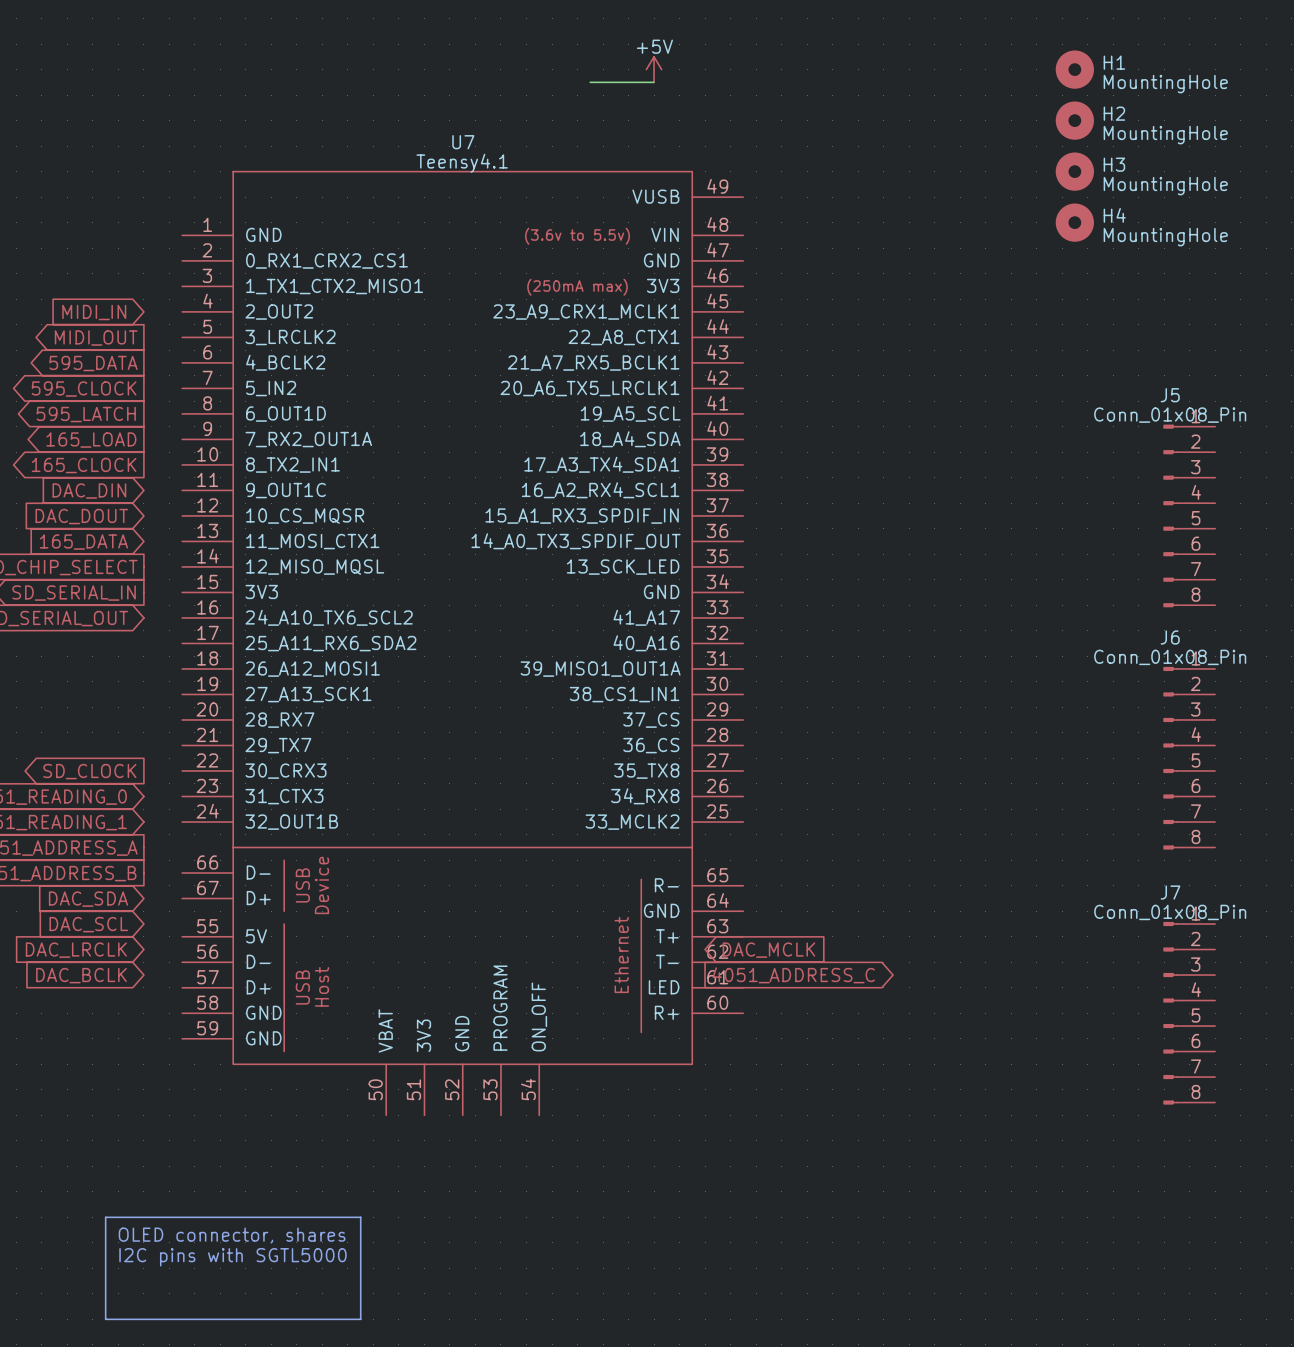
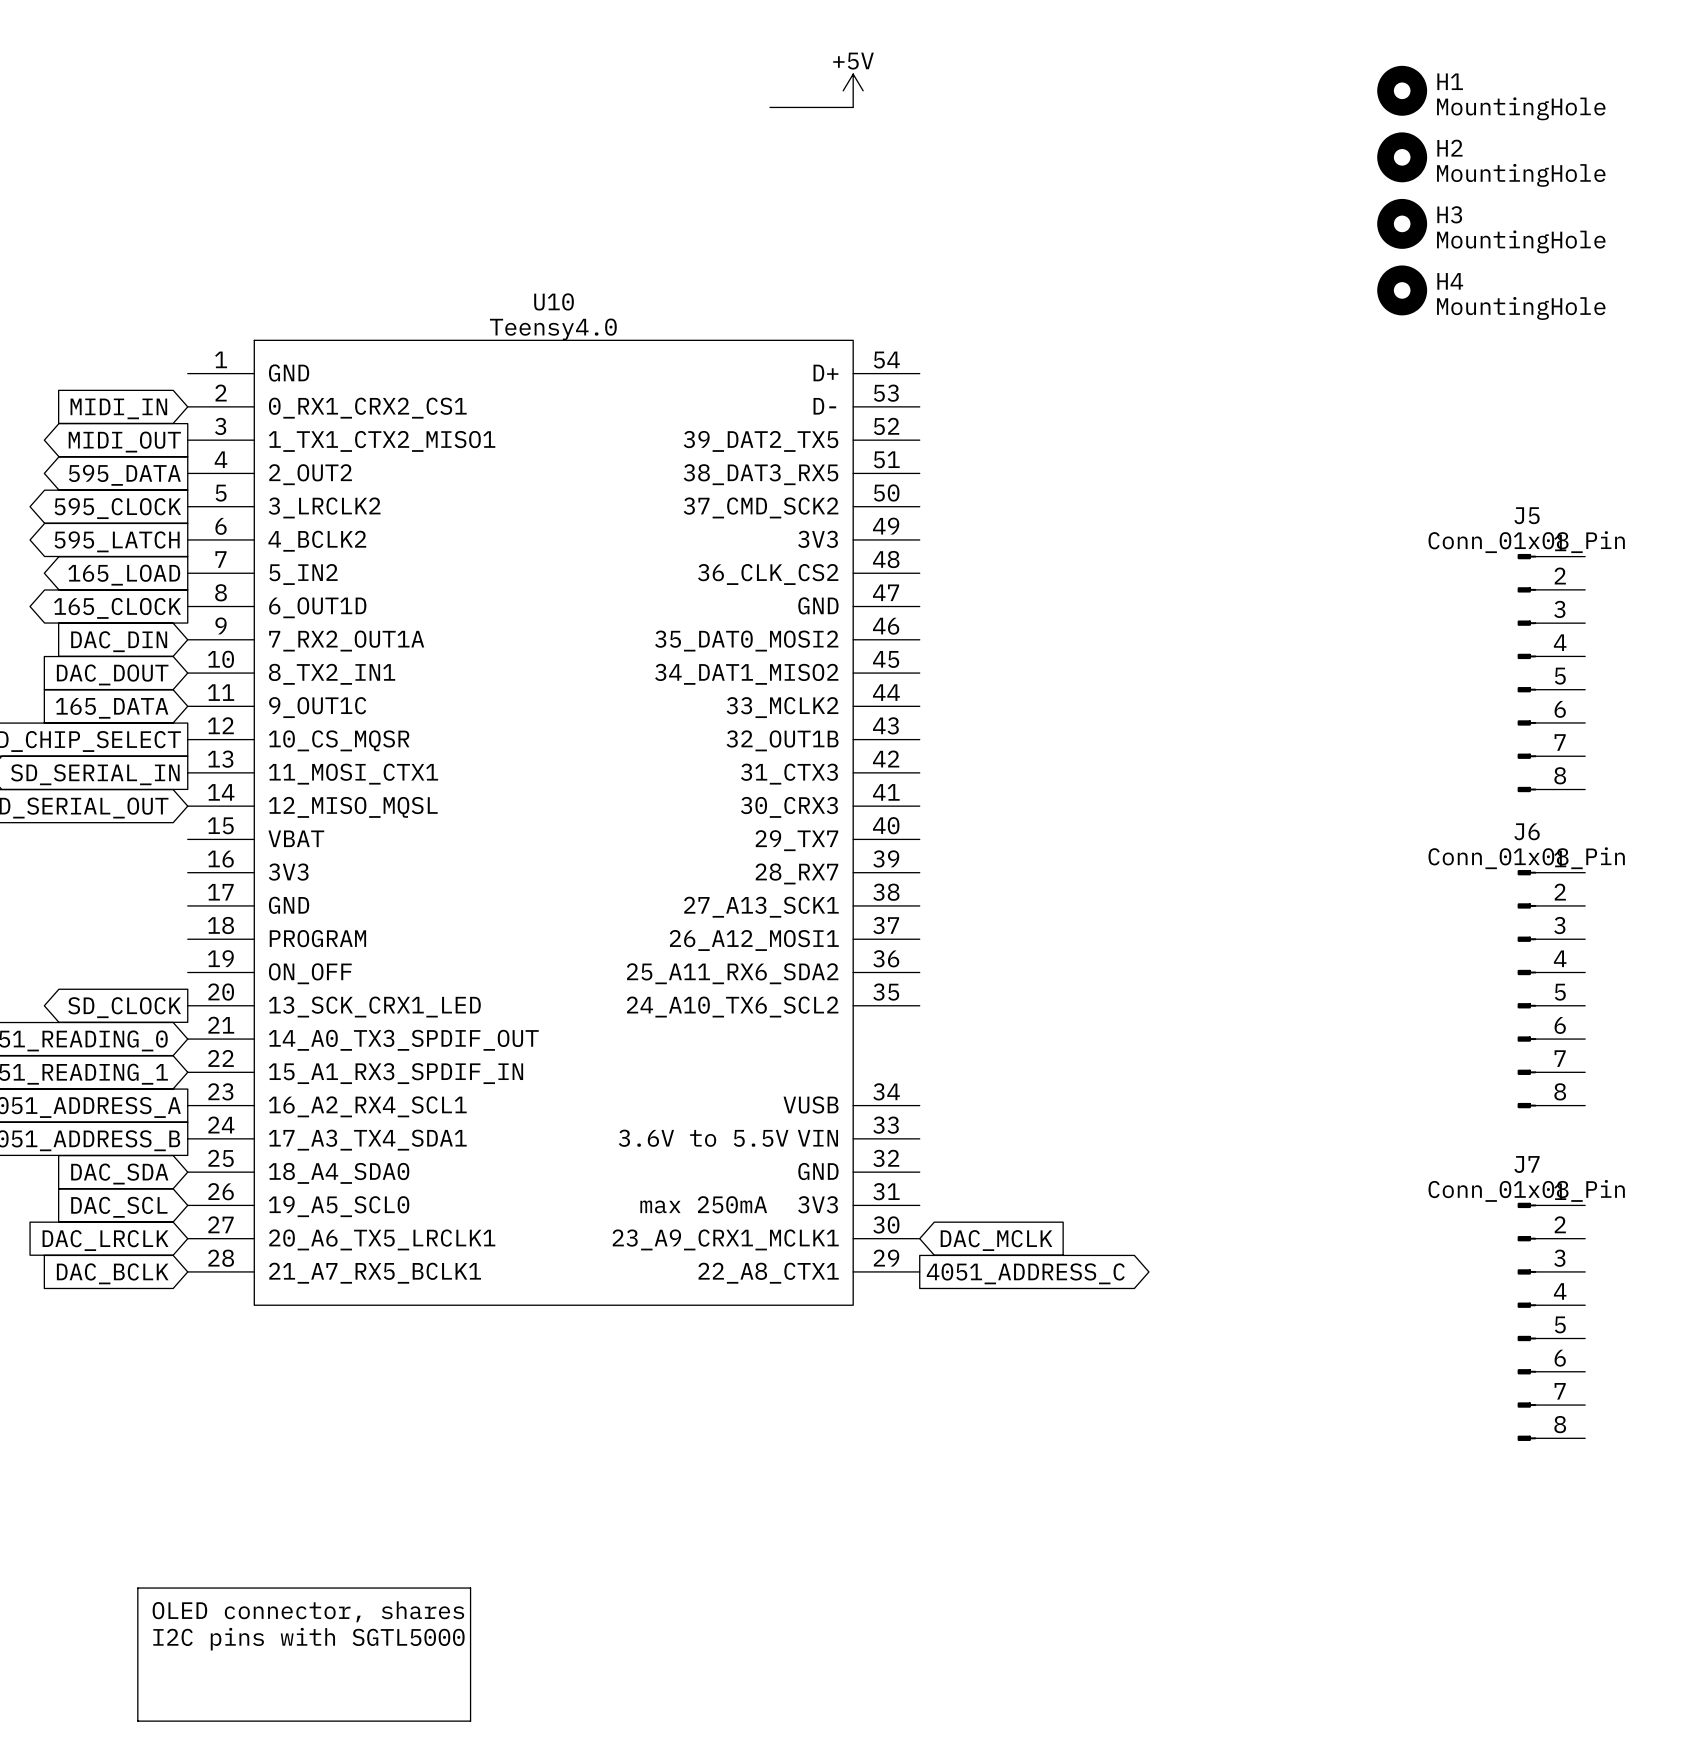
U10: none -> Teensy4.0 (553, 822)
U7: Teensy4.1 (462, 643) -> none

